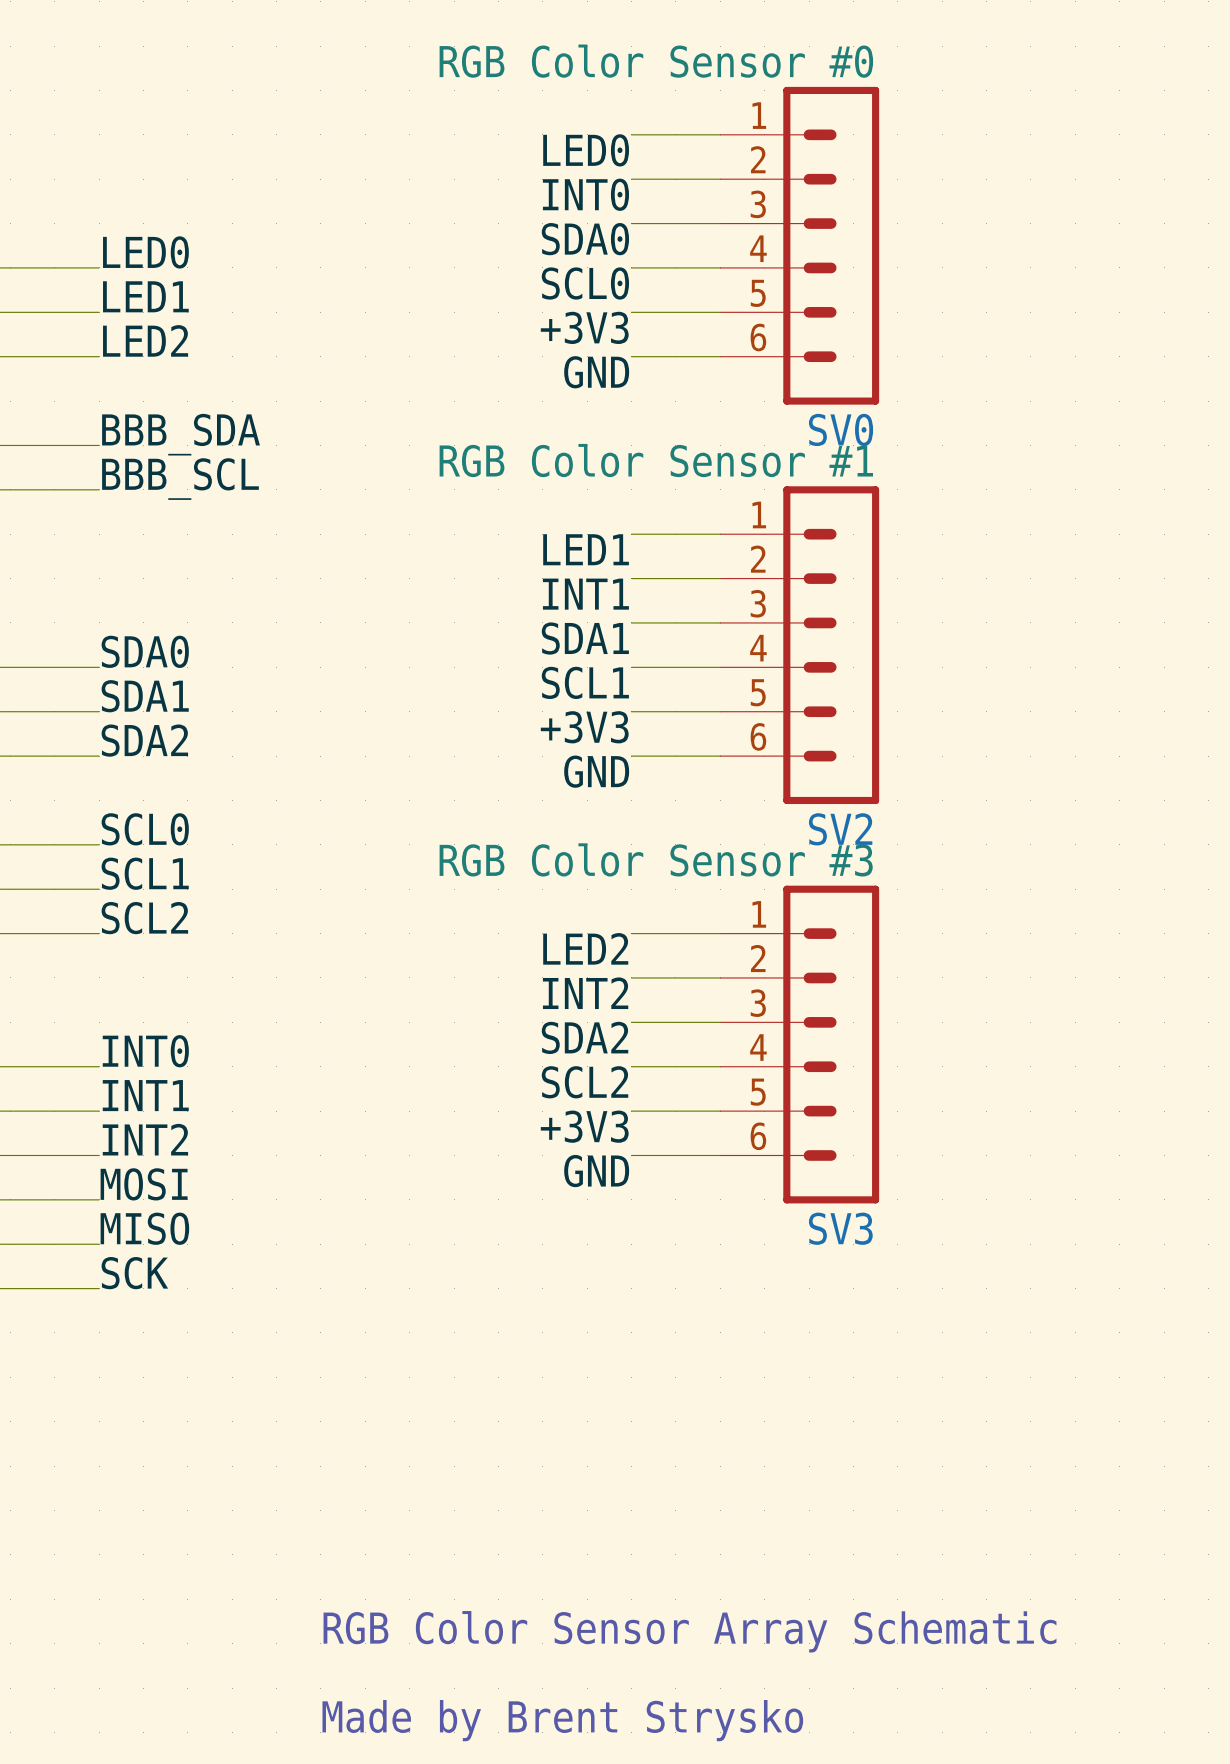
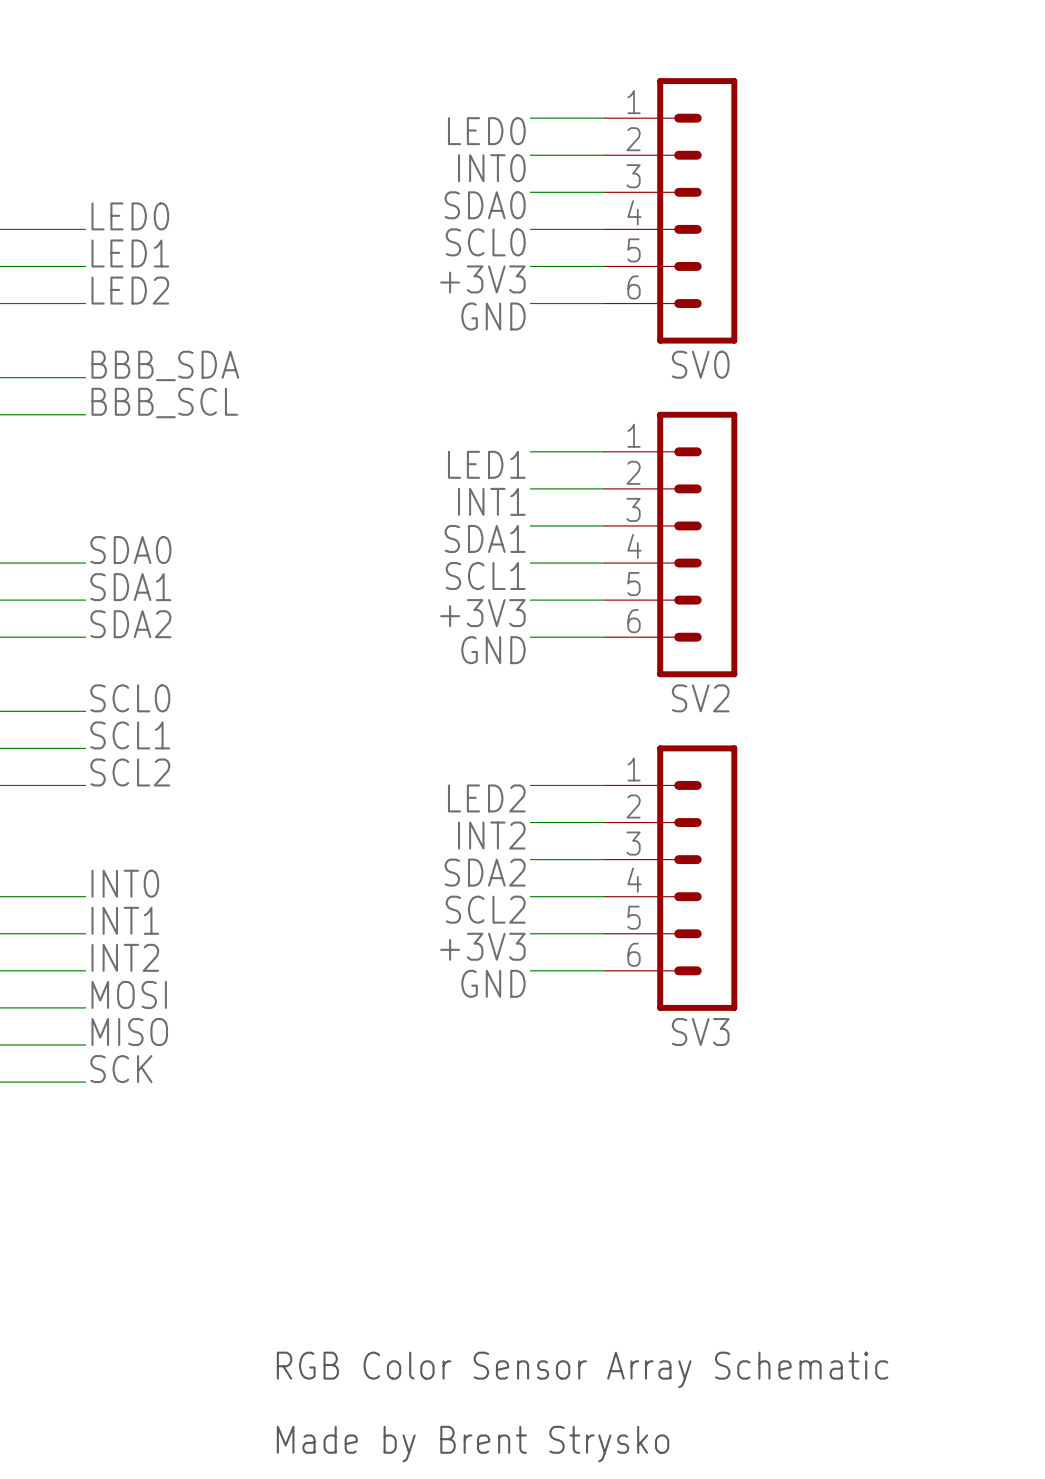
SV0 value: RGB Color Sensor #0 (656, 61) -> none
SV2 value: RGB Color Sensor #1 (656, 460) -> none
SV3 value: RGB Color Sensor #3 (656, 859) -> none

